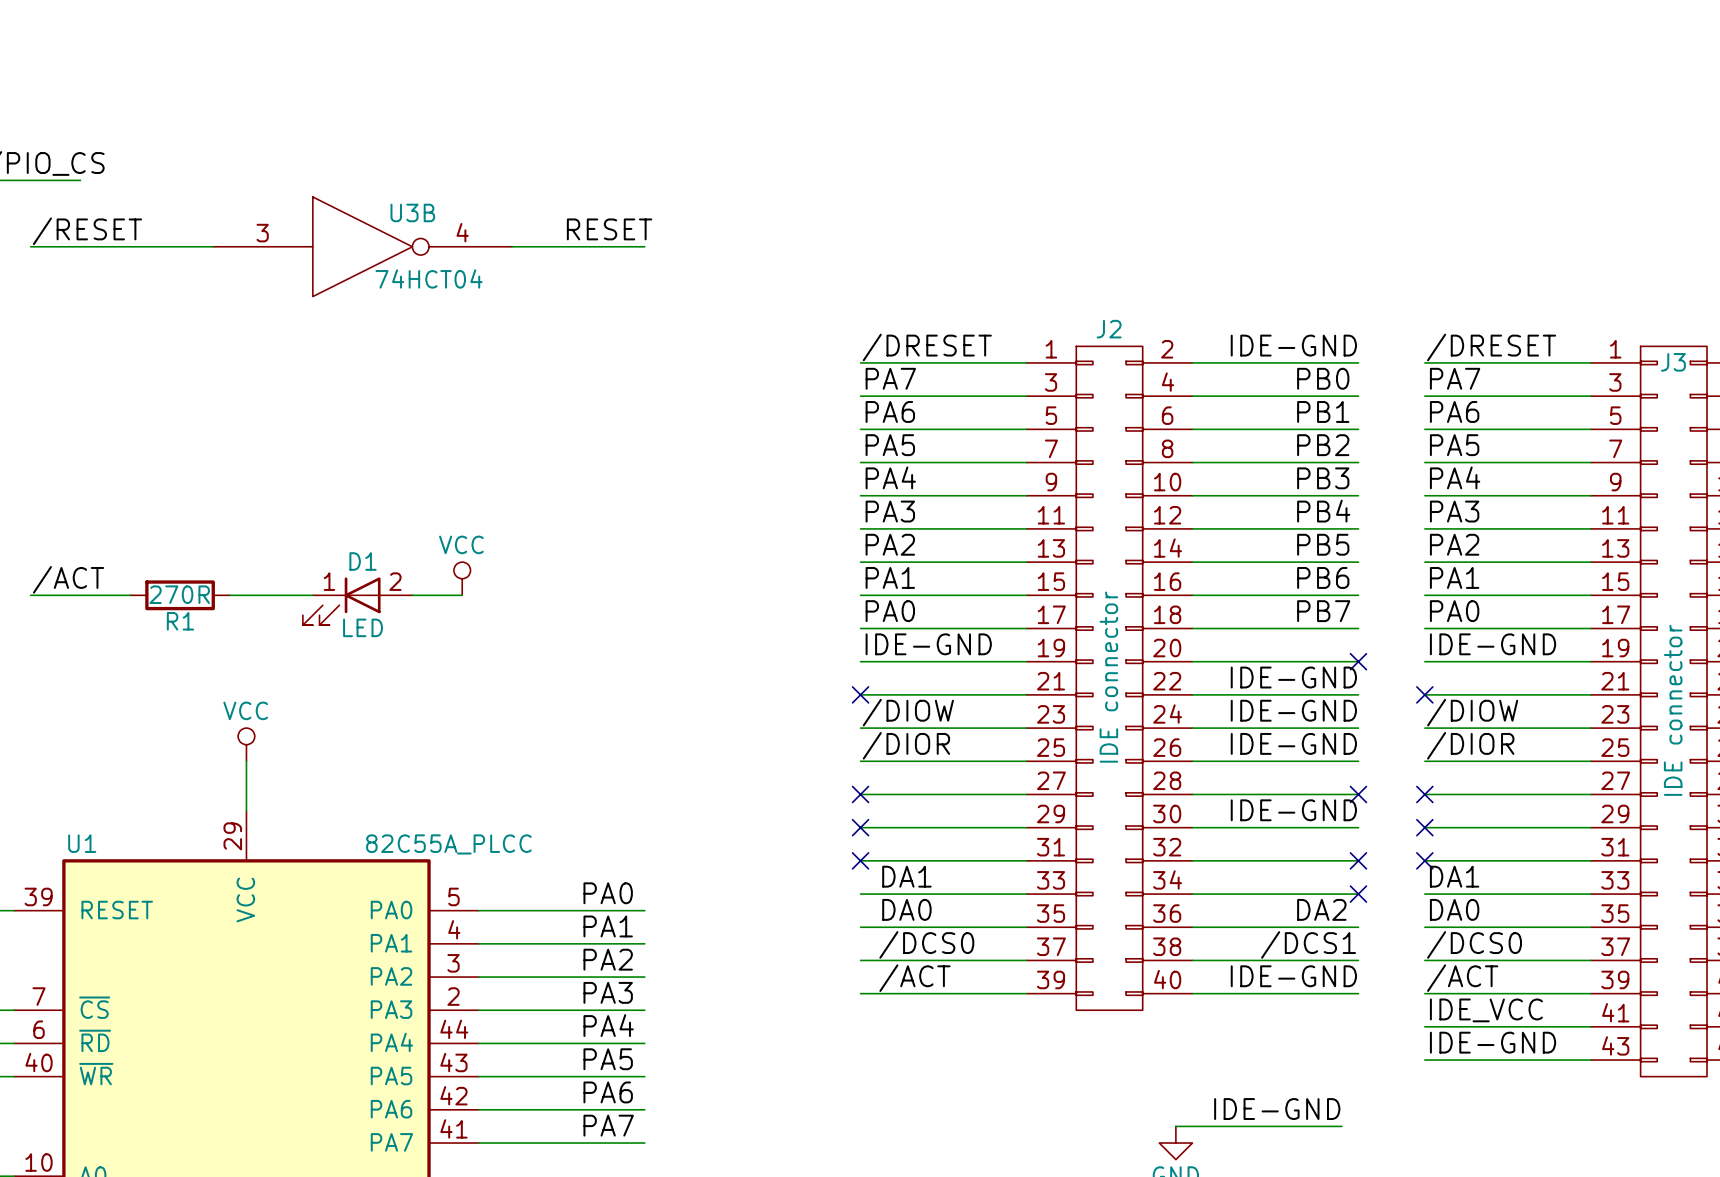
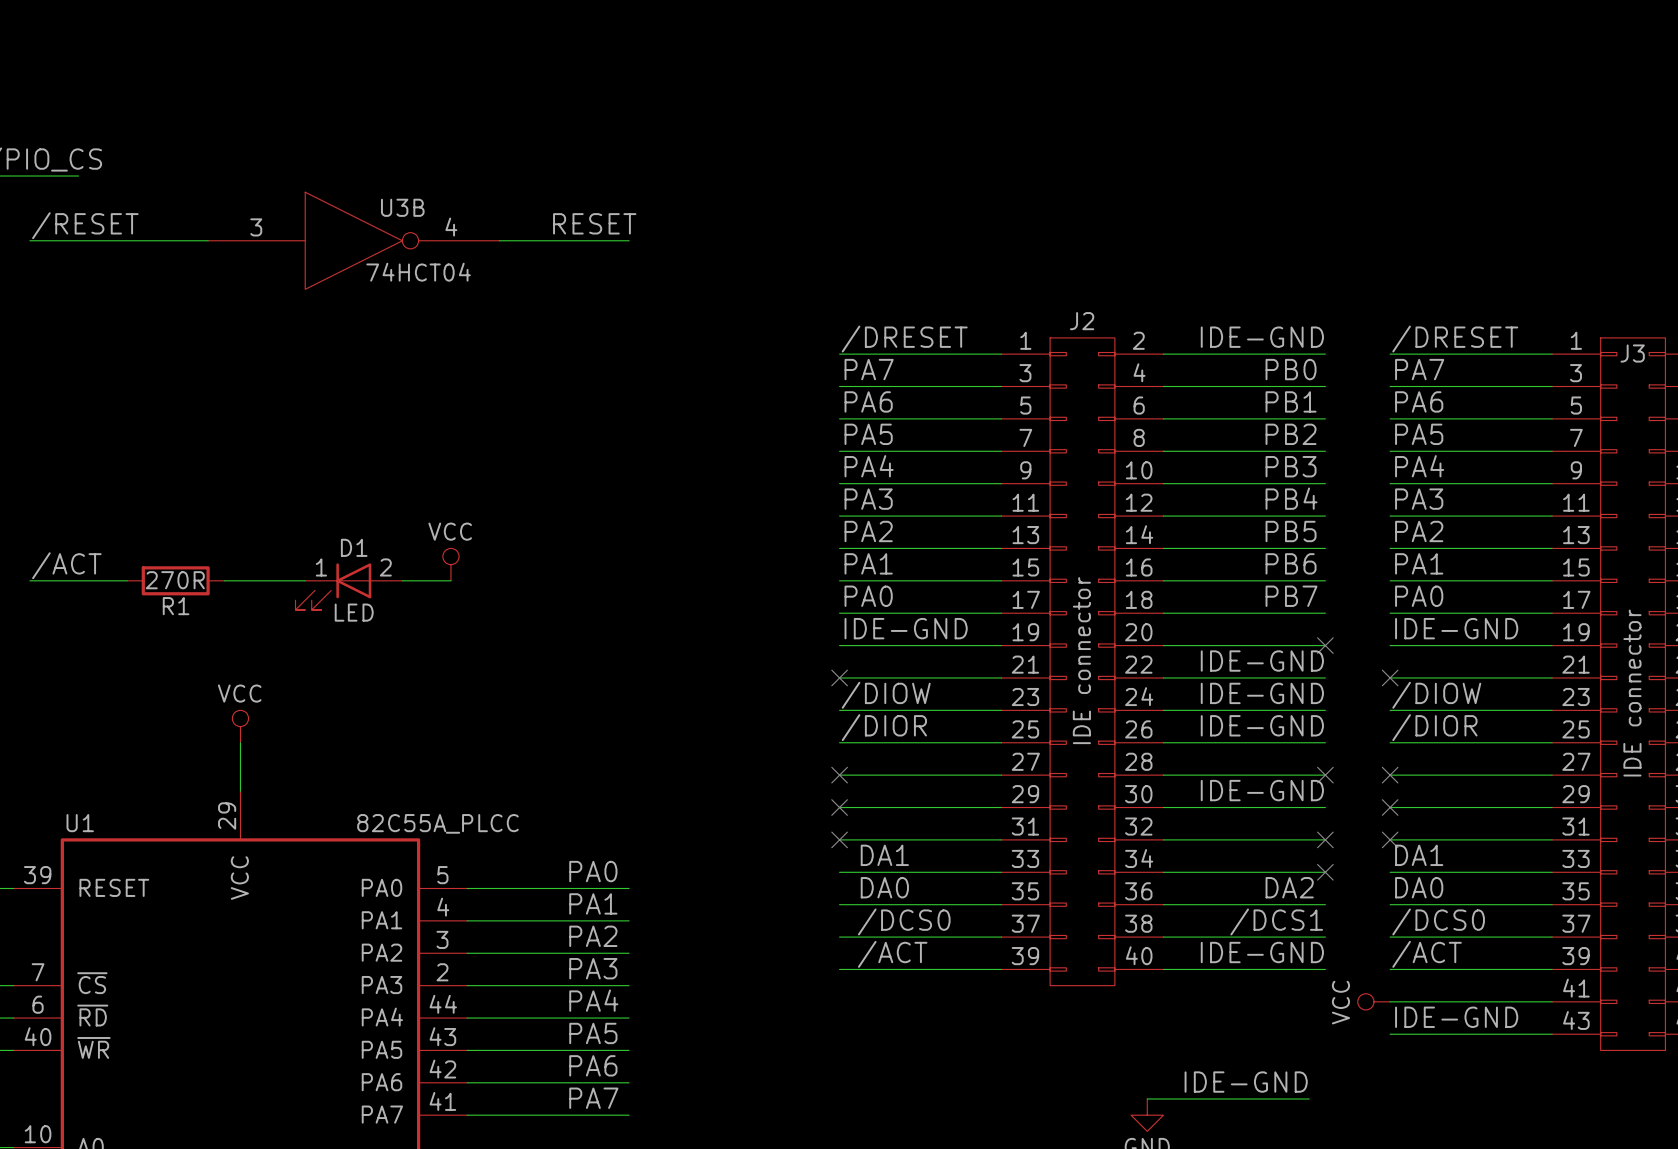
label: IDE_VCC (1486, 1010) -> none
power symbol: none -> VCC (1373, 1001)

